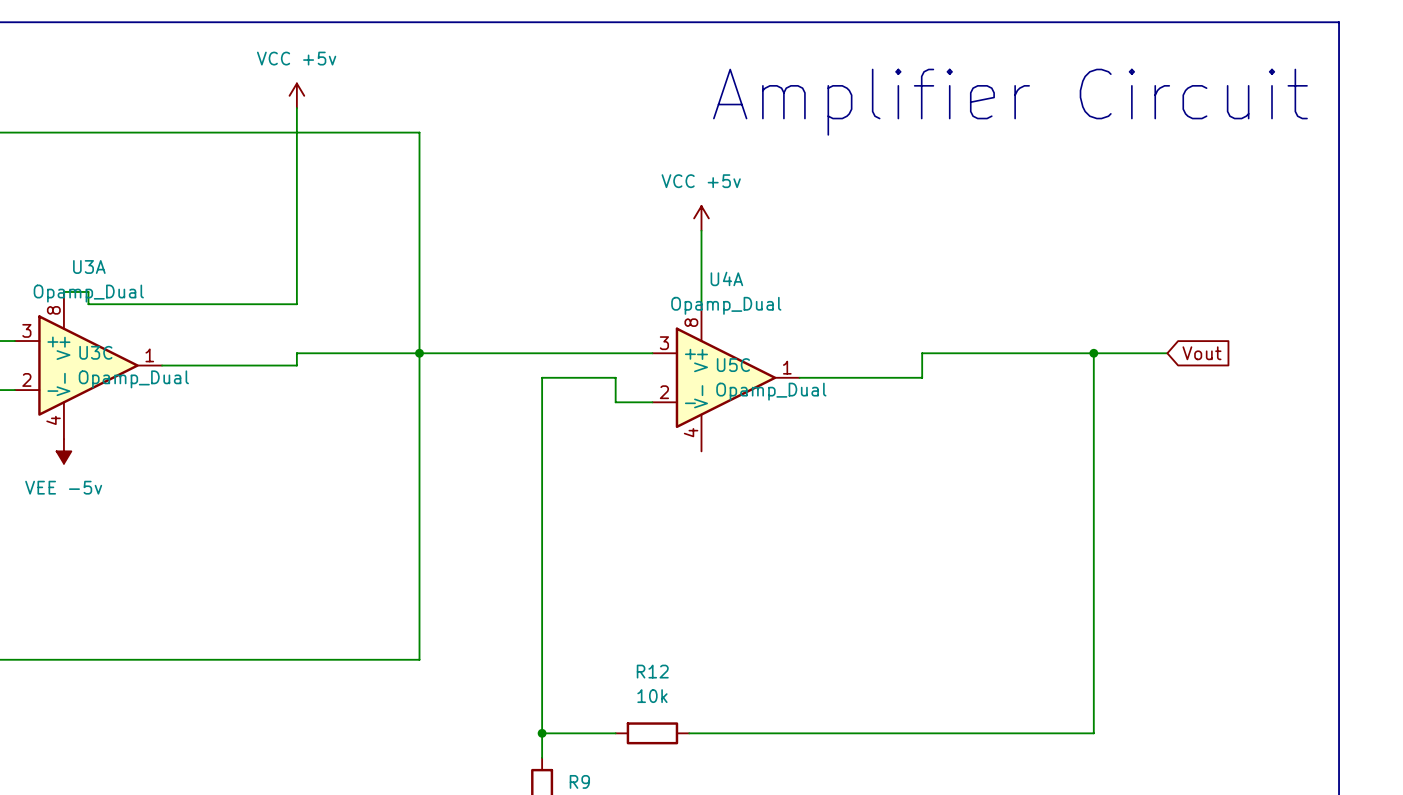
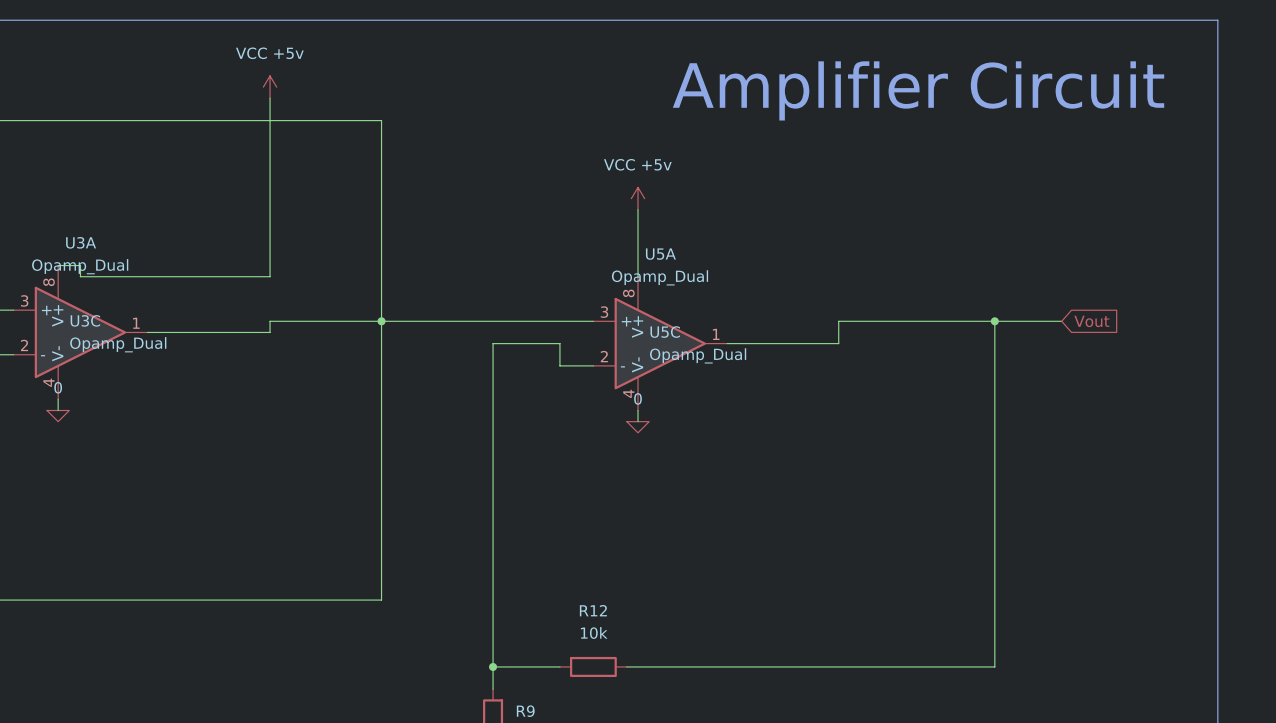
U4A name: U4A (726, 278) -> U5A (660, 254)
power symbol: VEE -5v (63, 451) -> 0 (58, 416)
wire: none -> (638, 410) (638, 421)
power symbol: none -> 0 (638, 427)

